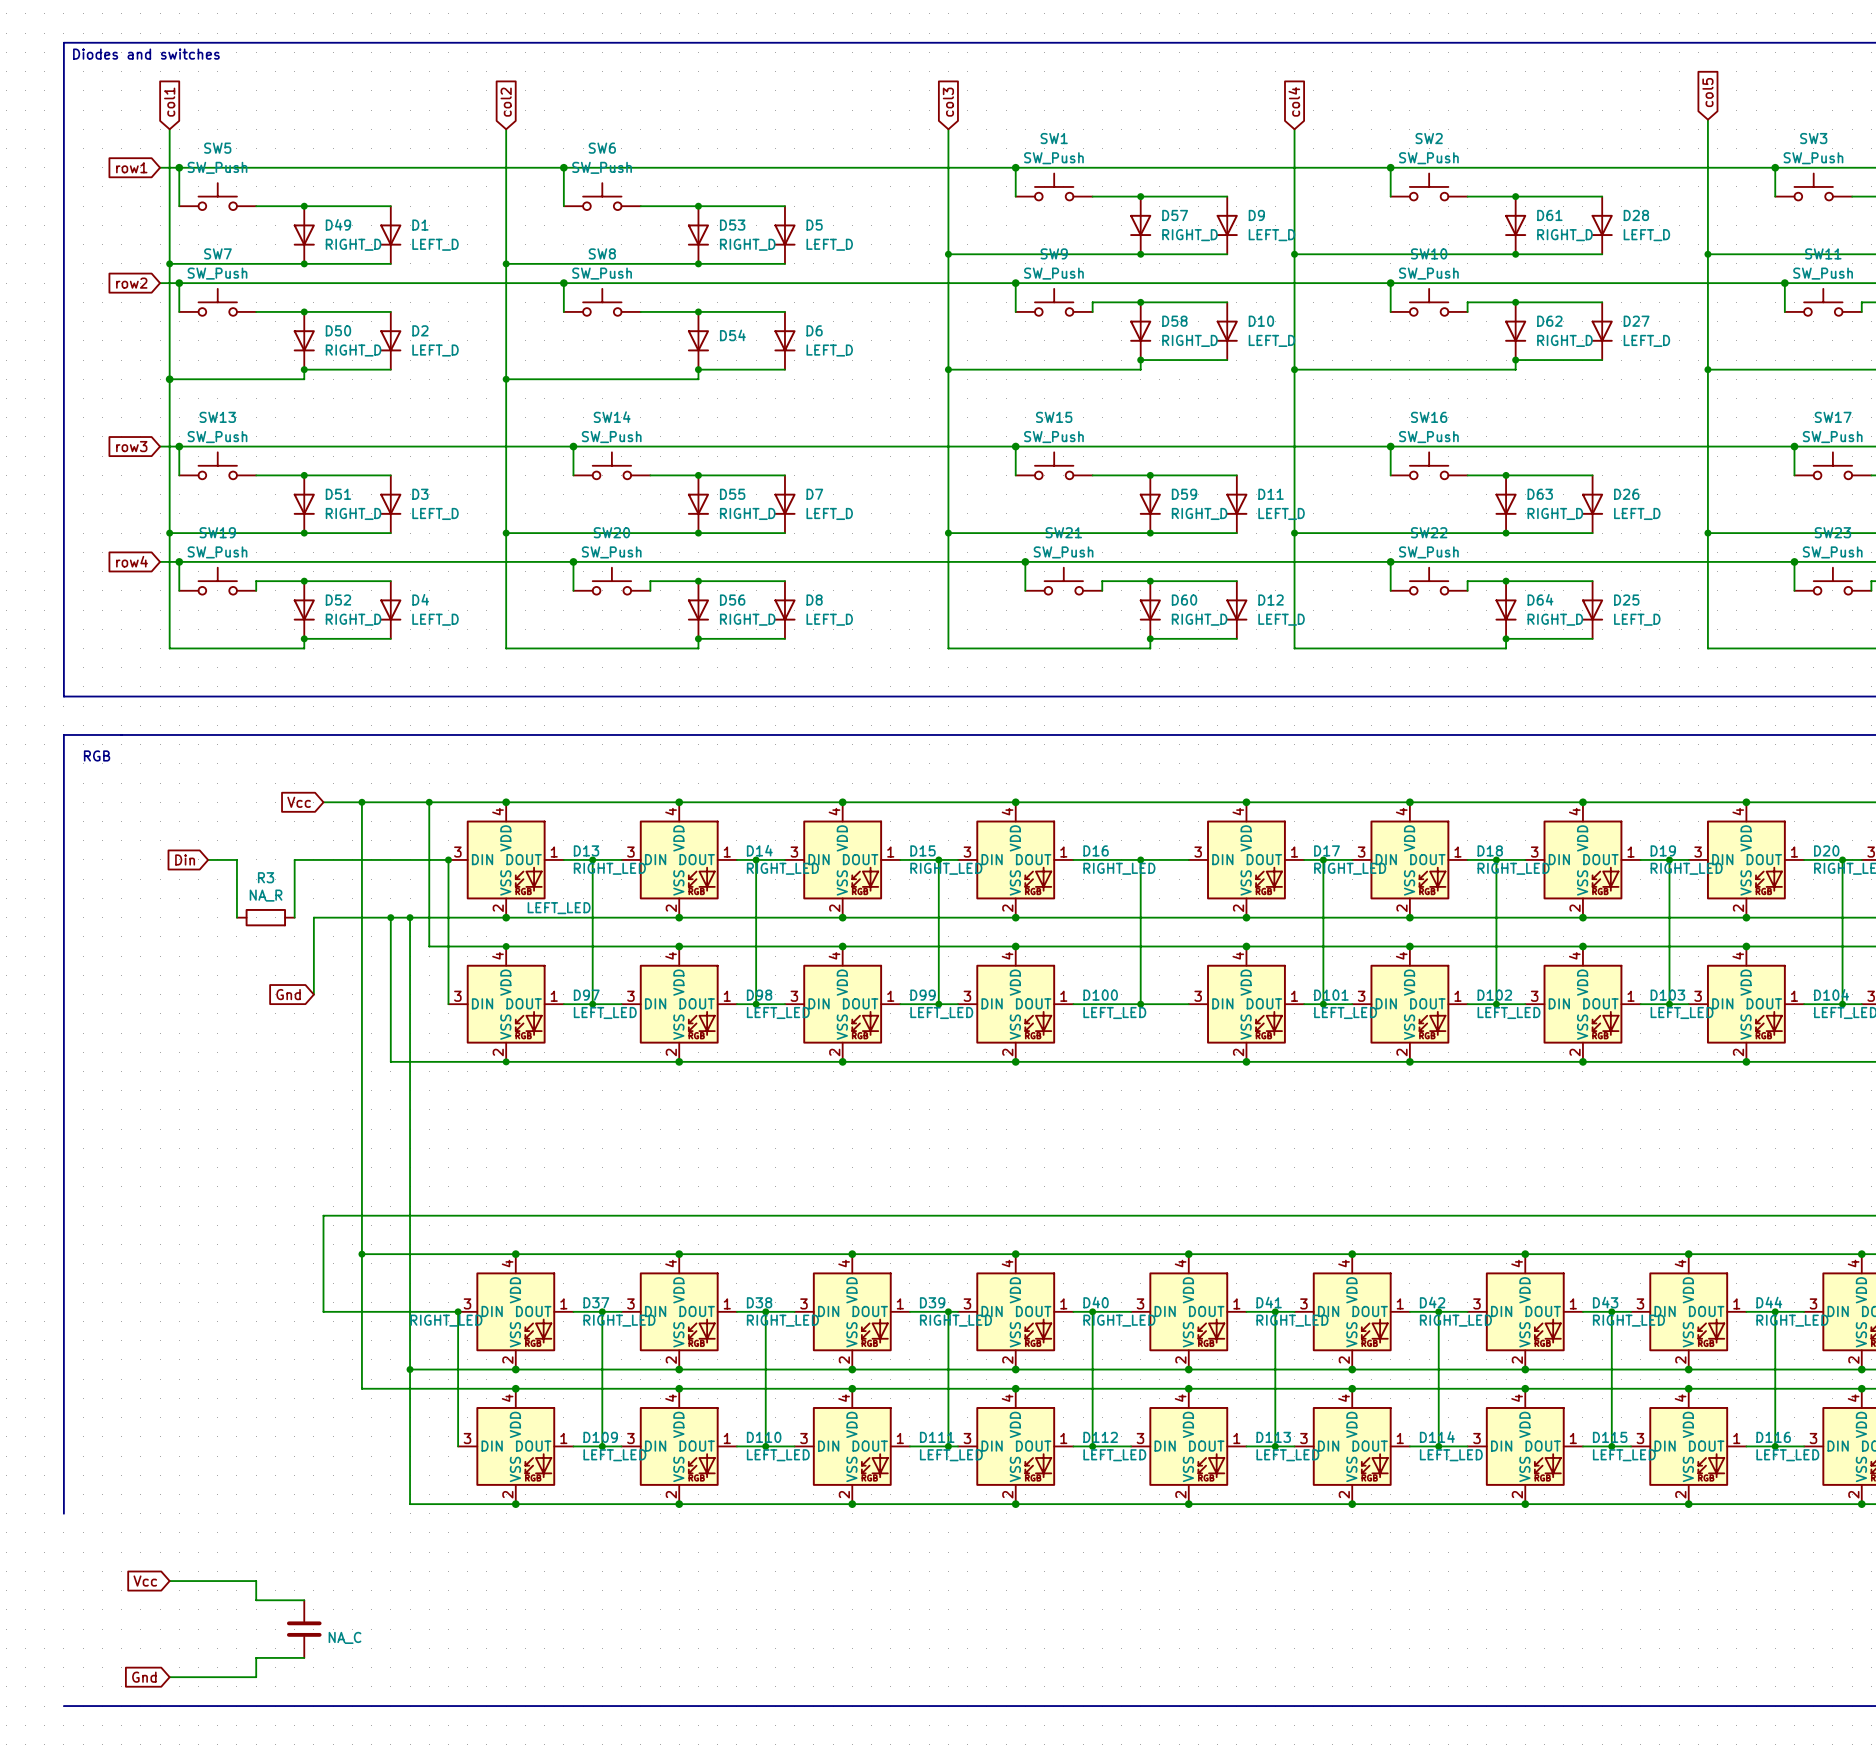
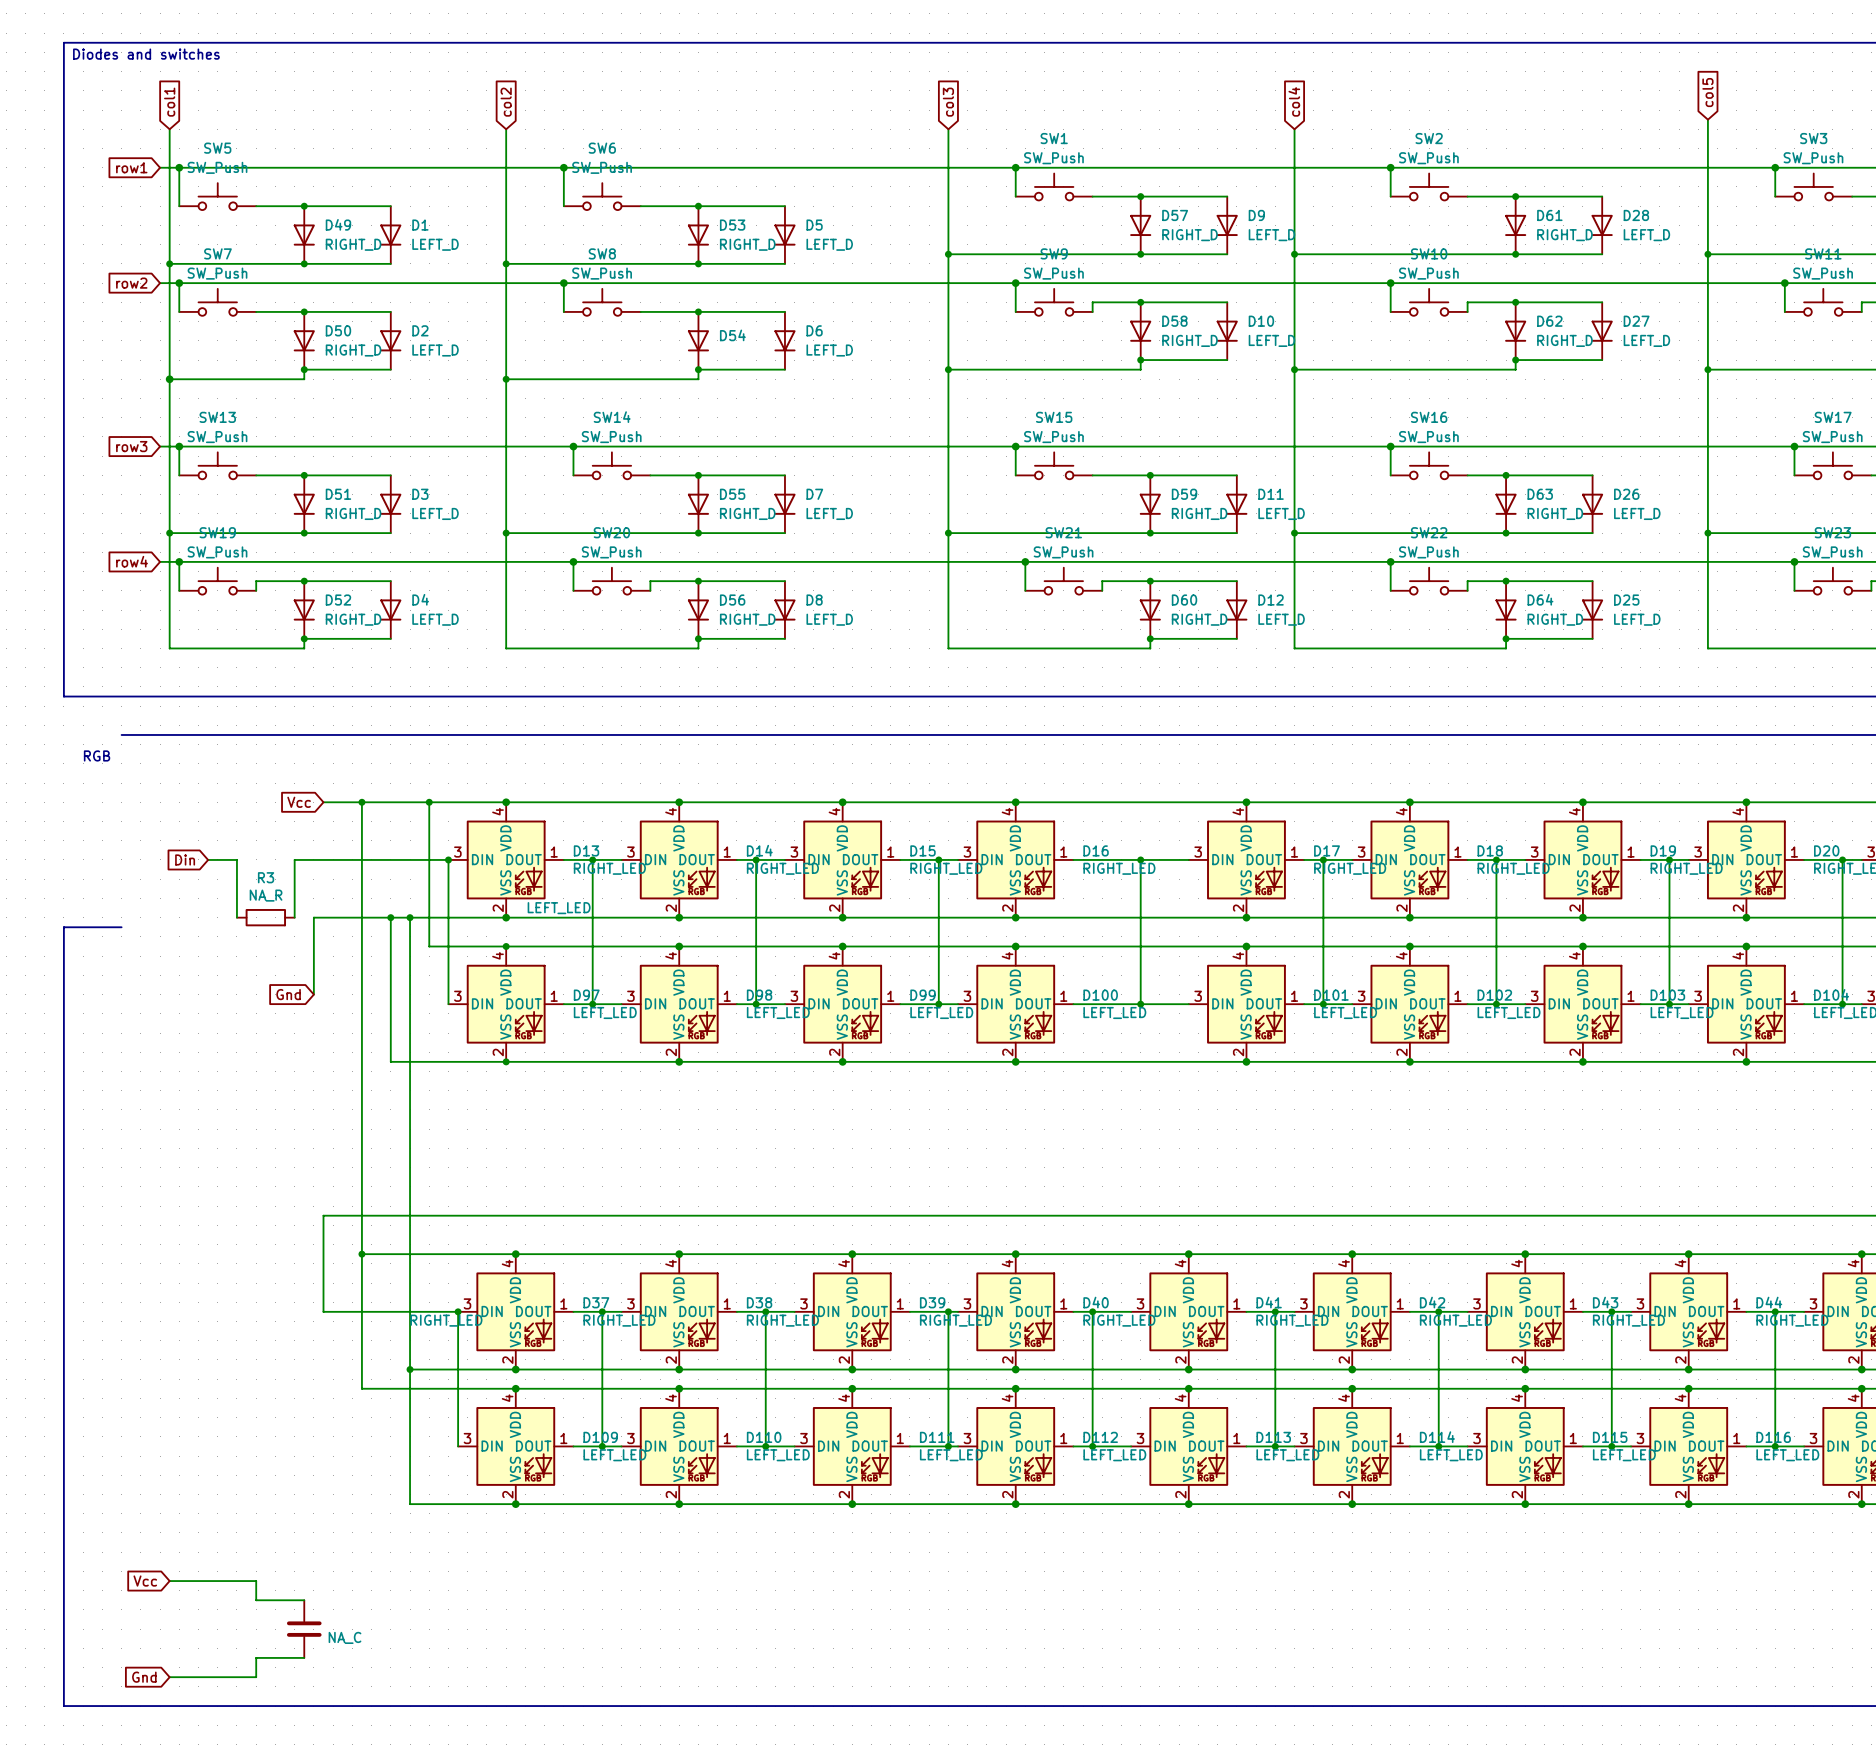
line: (121, 734) (63, 734) (63, 927) -> (121, 927) (63, 927)
line: none -> (63, 1513) (63, 1706)

